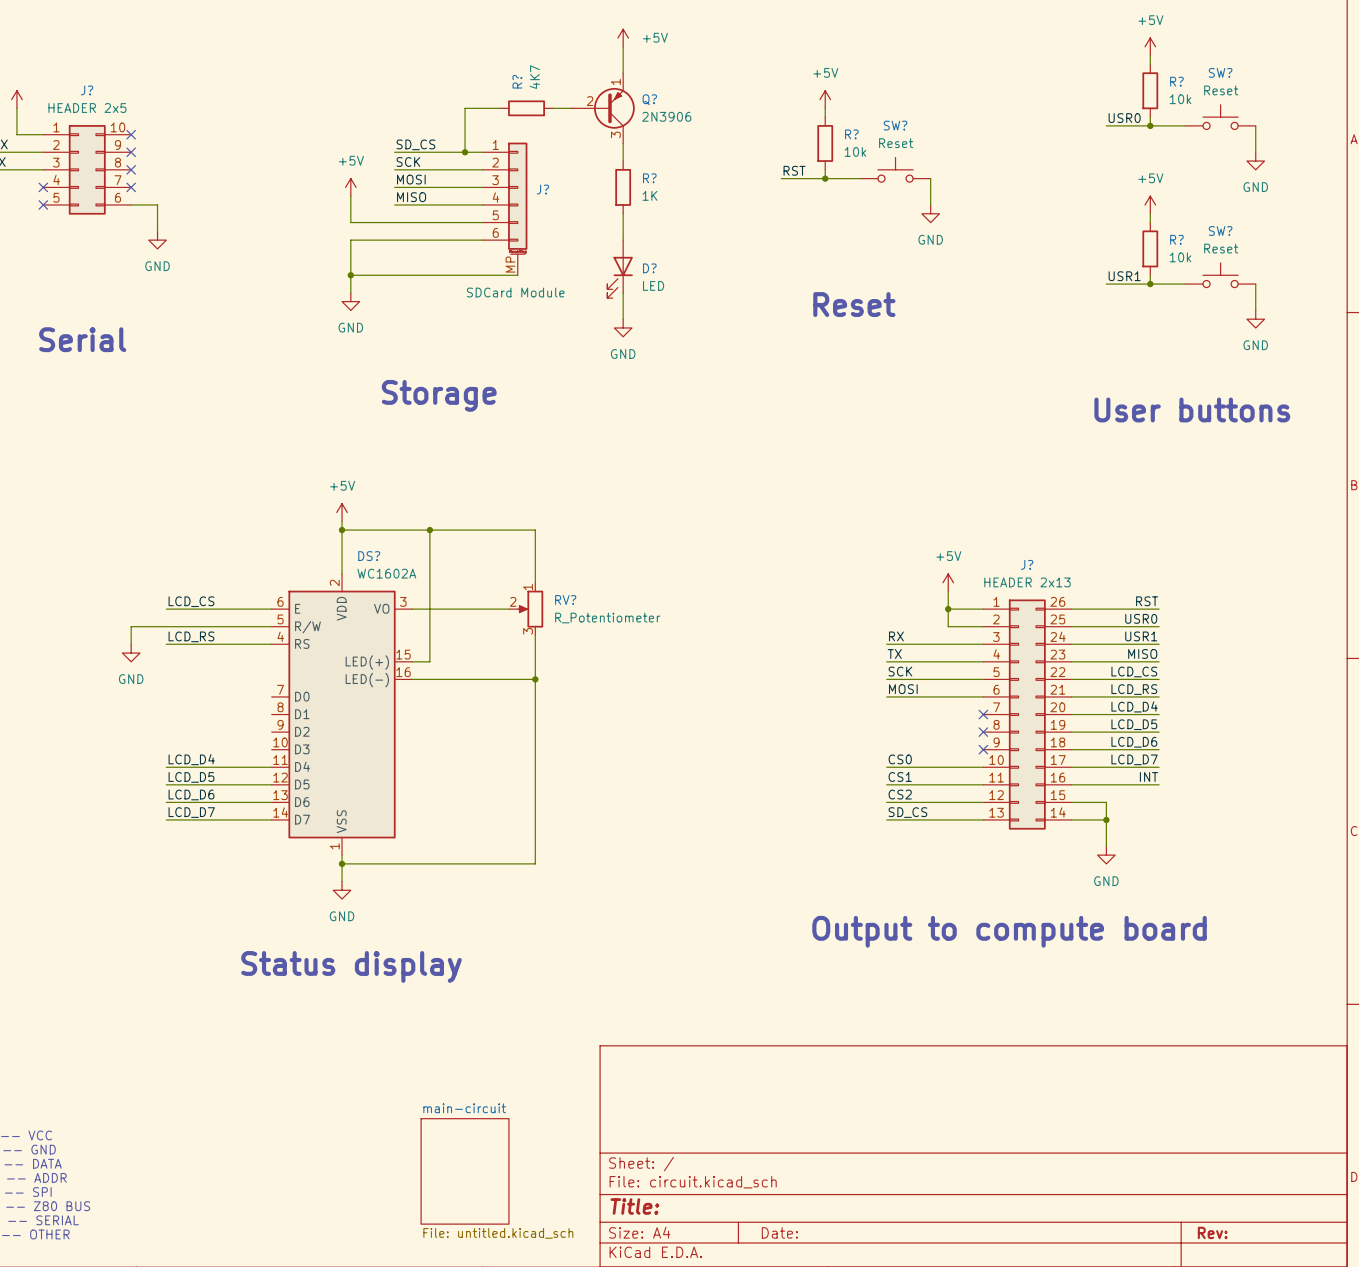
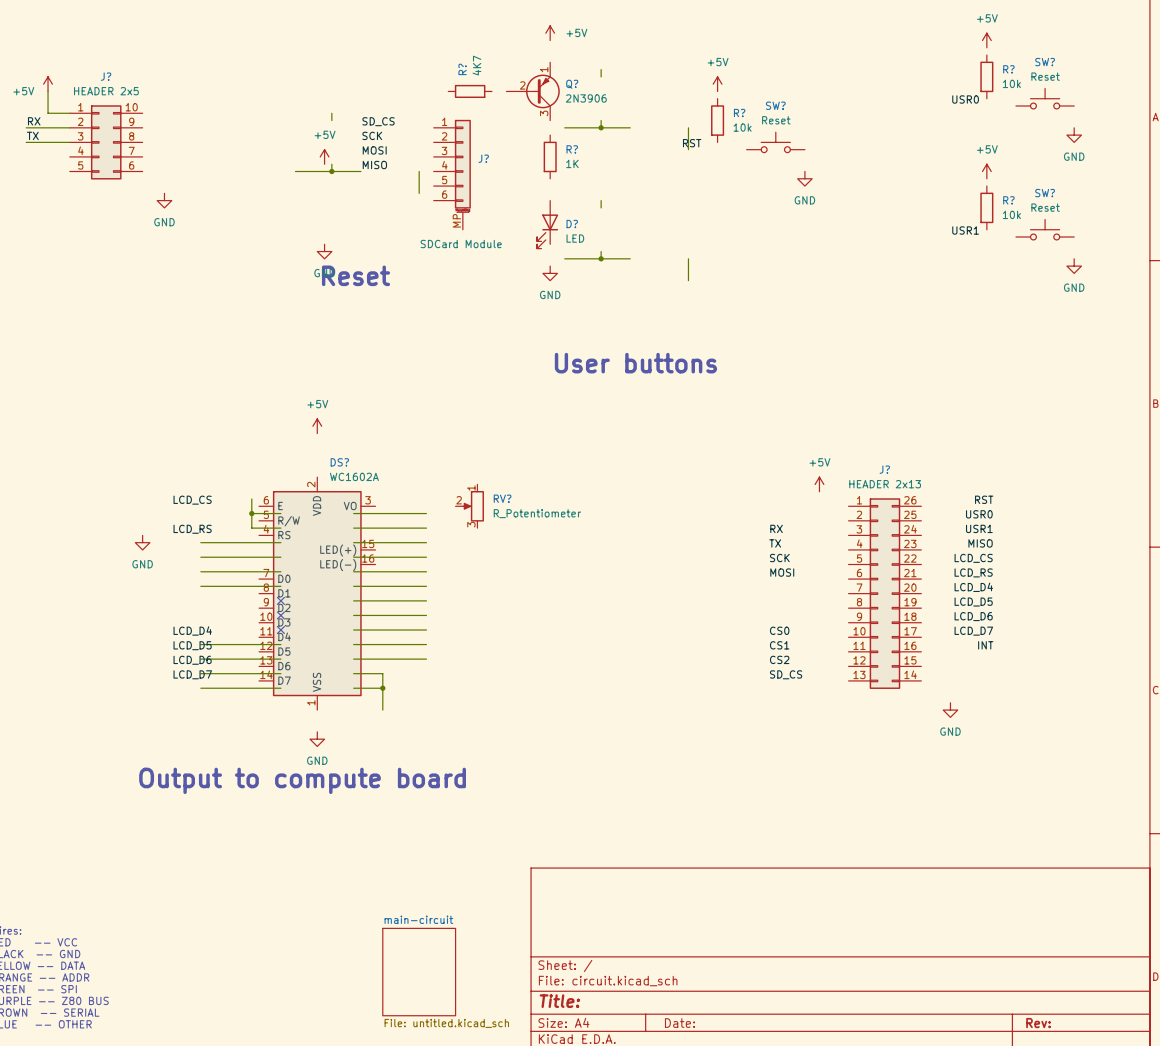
wire: (623, 46) (623, 73) -> none
wire: (1150, 55) (1150, 64) -> none
wire: (500, 108) (465, 108) (465, 152) -> none
wire: (552, 108) (570, 108) -> none
wire: (825, 108) (825, 117) -> (601, 69) (601, 76)
wire: (1150, 117) (1150, 125) -> none
wire: (1106, 125) (1185, 125) -> none
junction: (1150, 125) -> none
wire: (1255, 125) (1255, 152) -> none
no-connect mark: (131, 134) -> none
wire: none -> (331, 113) (331, 120)
wire: (623, 143) (623, 161) -> none
no-connect mark: (131, 152) -> none
wire: (394, 152) (482, 152) -> none
junction: (465, 152) -> none
junction: none -> (601, 127)
no-connect mark: (131, 169) -> none
wire: (394, 169) (482, 169) -> none
wire: (825, 169) (825, 178) -> (601, 120) (601, 127)
wire: (781, 178) (860, 178) -> (564, 127) (630, 127)
junction: (825, 178) -> none
wire: (930, 178) (930, 204) -> (688, 127) (688, 149)
no-connect mark: (43, 187) -> none
no-connect mark: (131, 187) -> none
wire: (394, 187) (482, 187) -> none
wire: (350, 196) (350, 222) (482, 222) -> none
wire: none -> (331, 164) (331, 171)
no-connect mark: (43, 204) -> none
wire: (131, 204) (157, 204) (157, 231) -> none
junction: none -> (331, 171)
wire: (394, 204) (482, 204) -> (360, 171) (295, 171)
wire: (623, 213) (623, 240) -> (419, 171) (419, 193)
wire: (1150, 213) (1150, 222) -> none
wire: (482, 240) (350, 240) (350, 292) -> none
wire: none -> (601, 200) (601, 207)
wire: (350, 275) (517, 275) -> none
junction: (350, 275) -> none
wire: (1150, 275) (1150, 284) -> none
wire: (1106, 284) (1185, 284) -> none
junction: (1150, 284) -> none
wire: (1255, 284) (1255, 310) -> none
wire: (623, 292) (623, 319) -> (688, 258) (688, 280)
wire: none -> (601, 251) (601, 258)
text: Reset (854, 304) -> none
wire: none -> (564, 258) (630, 258)
junction: none -> (601, 258)
text: none -> Reset (355, 275)
text: Serial (82, 339) -> none
text: Storage (439, 395) -> none
text: User buttons (1192, 409) -> none
text: none -> User buttons (635, 363)
wire: (342, 521) (342, 573) -> none
wire: (342, 530) (535, 530) (535, 582) -> none
junction: (342, 530) -> none
wire: (429, 530) (429, 661) (412, 661) -> none
junction: (429, 530) -> none
wire: (948, 591) (948, 626) (983, 626) -> none
wire: none -> (251, 499) (251, 528) (280, 528)
wire: (166, 609) (271, 609) -> none
wire: (412, 609) (508, 609) -> none
wire: (948, 609) (983, 609) -> none
junction: (948, 609) -> none
wire: (1071, 609) (1159, 609) -> none
wire: none -> (251, 513) (280, 513)
junction: none -> (251, 513)
wire: none -> (353, 513) (426, 513)
wire: (271, 626) (131, 626) (131, 644) -> none
wire: (1071, 626) (1159, 626) -> none
wire: none -> (353, 528) (426, 528)
wire: (535, 635) (535, 863) (342, 863) -> none
wire: (166, 644) (271, 644) -> none
wire: (886, 644) (983, 644) -> none
wire: (1071, 644) (1159, 644) -> none
wire: none -> (200, 542) (280, 542)
wire: none -> (353, 542) (426, 542)
wire: (886, 661) (983, 661) -> none
wire: (1071, 661) (1159, 661) -> none
wire: none -> (200, 557) (280, 557)
wire: none -> (353, 557) (426, 557)
wire: (412, 679) (535, 679) -> none
junction: (535, 679) -> none
wire: (886, 679) (983, 679) -> none
wire: (1071, 679) (1159, 679) -> none
wire: none -> (200, 571) (280, 571)
wire: none -> (353, 571) (426, 571)
wire: (886, 696) (983, 696) -> none
wire: (1071, 696) (1159, 696) -> none
wire: none -> (200, 586) (280, 586)
wire: none -> (353, 586) (426, 586)
no-connect mark: (983, 714) -> none
wire: (1071, 714) (1159, 714) -> none
no-connect mark: none -> (280, 600)
wire: none -> (353, 600) (426, 600)
no-connect mark: (983, 732) -> none
wire: (1071, 732) (1159, 732) -> none
no-connect mark: none -> (280, 615)
wire: none -> (353, 615) (426, 615)
no-connect mark: (983, 749) -> none
wire: (1071, 749) (1159, 749) -> none
no-connect mark: none -> (280, 630)
wire: none -> (353, 630) (426, 630)
wire: (166, 767) (271, 767) -> none
wire: (886, 767) (983, 767) -> none
wire: (1071, 767) (1159, 767) -> none
wire: none -> (200, 644) (280, 644)
wire: none -> (353, 644) (426, 644)
wire: (166, 784) (271, 784) -> none
wire: (886, 784) (983, 784) -> none
wire: (1071, 784) (1159, 784) -> none
wire: none -> (200, 659) (280, 659)
wire: none -> (353, 659) (426, 659)
wire: (166, 802) (271, 802) -> none
wire: (886, 802) (983, 802) -> none
wire: (1071, 802) (1106, 802) (1106, 846) -> none
wire: none -> (200, 673) (280, 673)
wire: none -> (353, 673) (382, 673) (382, 710)
wire: (166, 819) (271, 819) -> none
wire: (886, 819) (983, 819) -> none
wire: (1071, 819) (1106, 819) -> none
junction: (1106, 819) -> none
wire: none -> (200, 688) (280, 688)
wire: none -> (353, 688) (382, 688)
junction: none -> (382, 688)
wire: (342, 855) (342, 881) -> none
junction: (342, 863) -> none
text: Output to compute board (1009, 931) -> none
text: none -> Output to compute board (302, 780)
text: Status display (351, 966) -> none

